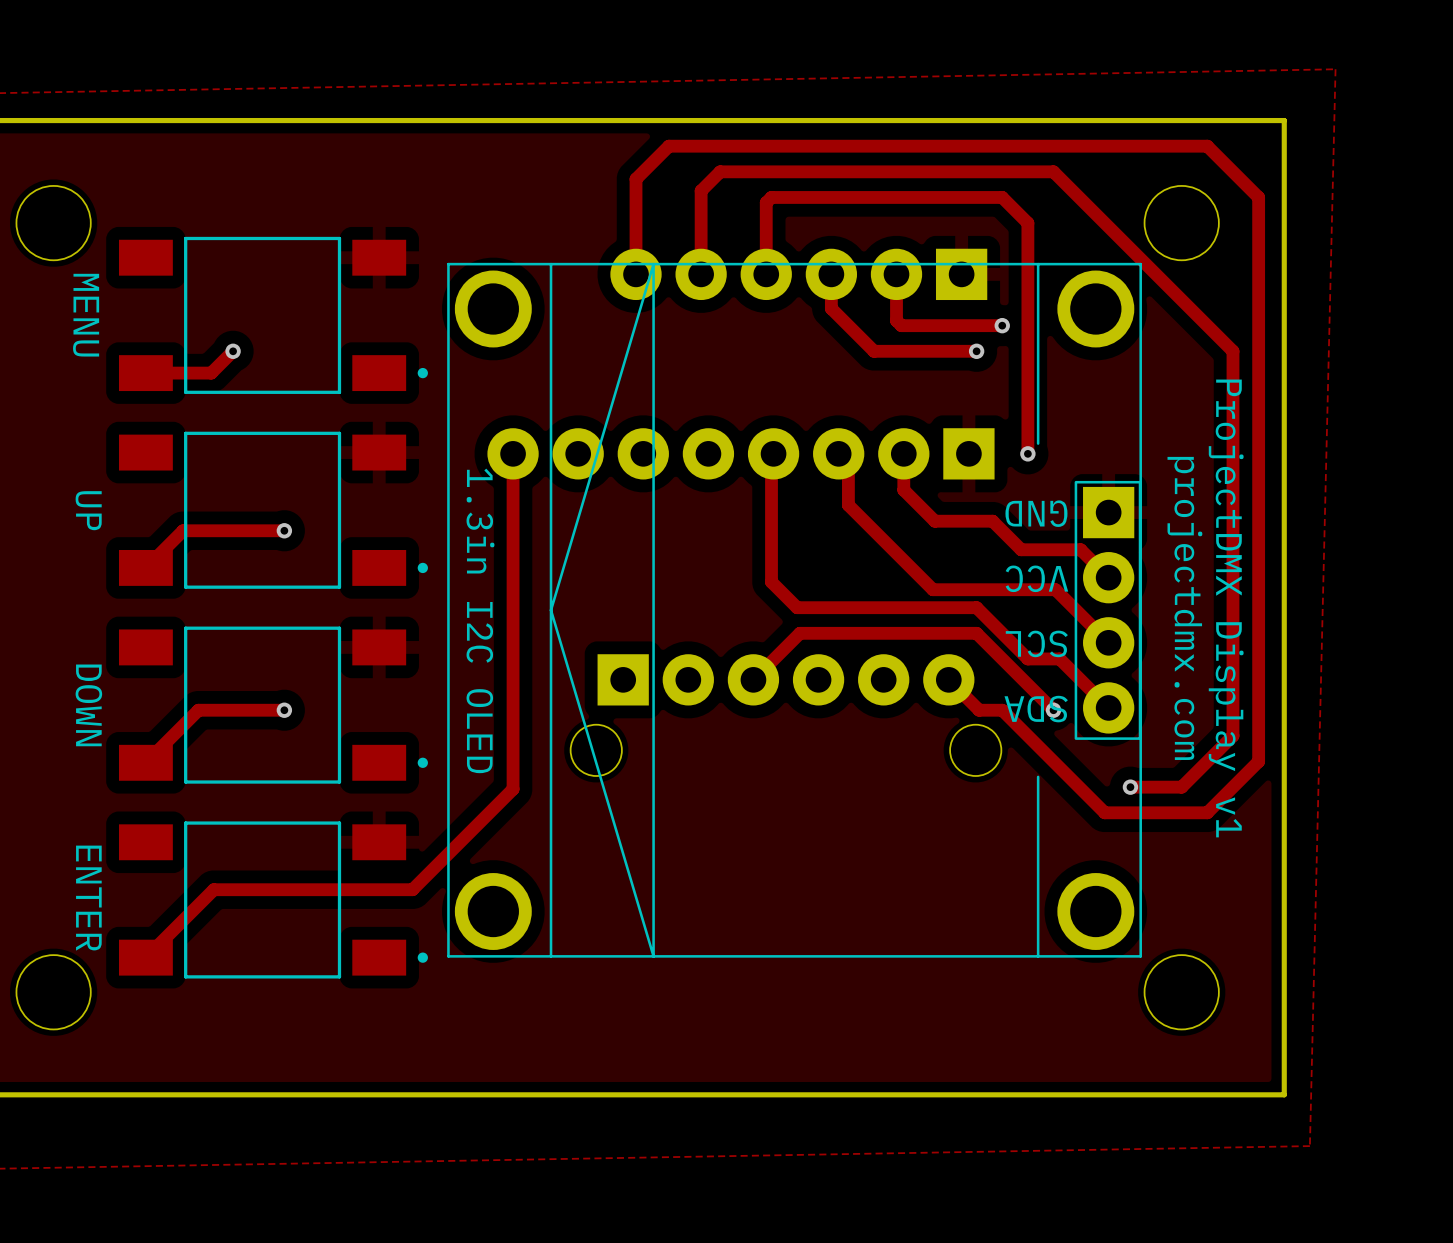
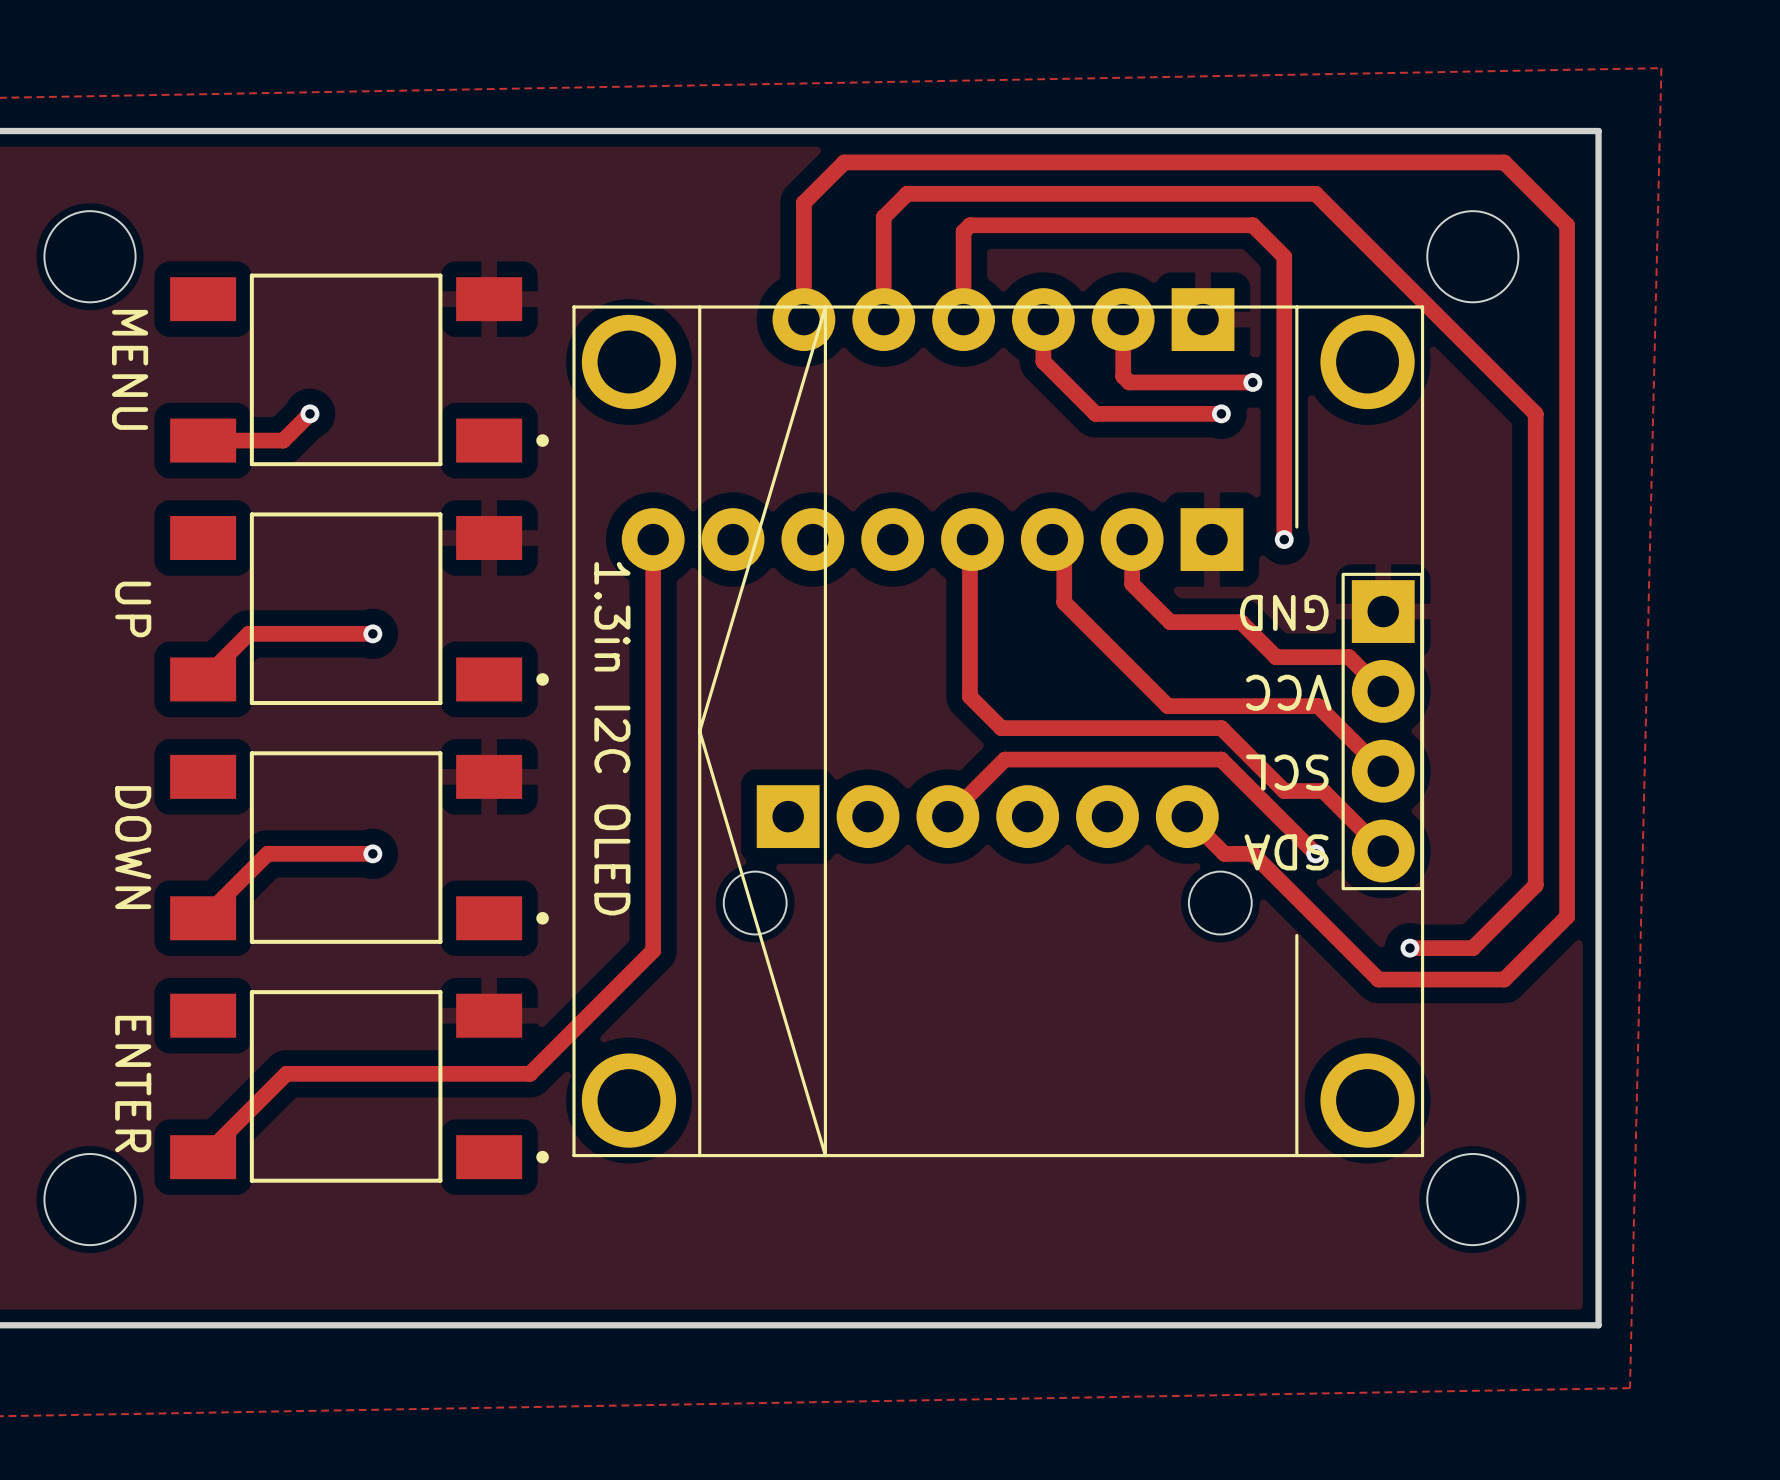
text: projectdmx.com (1184, 608) -> none
text: ProjectDMX Display v1 (1226, 608) -> none

